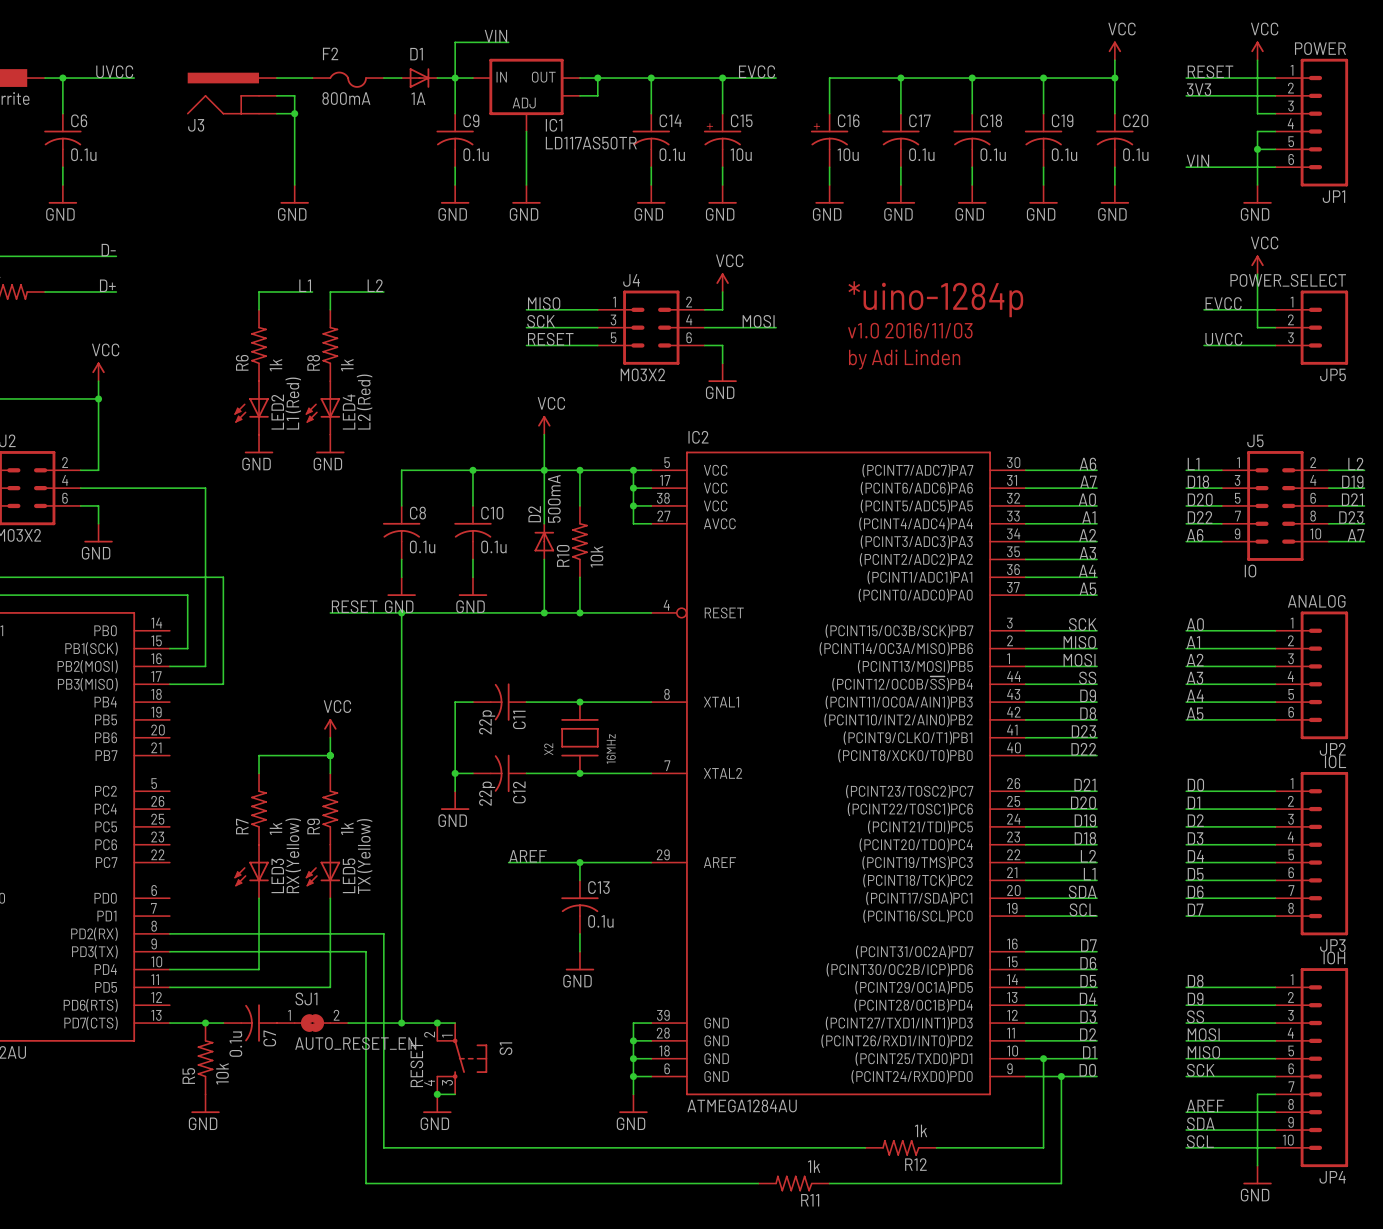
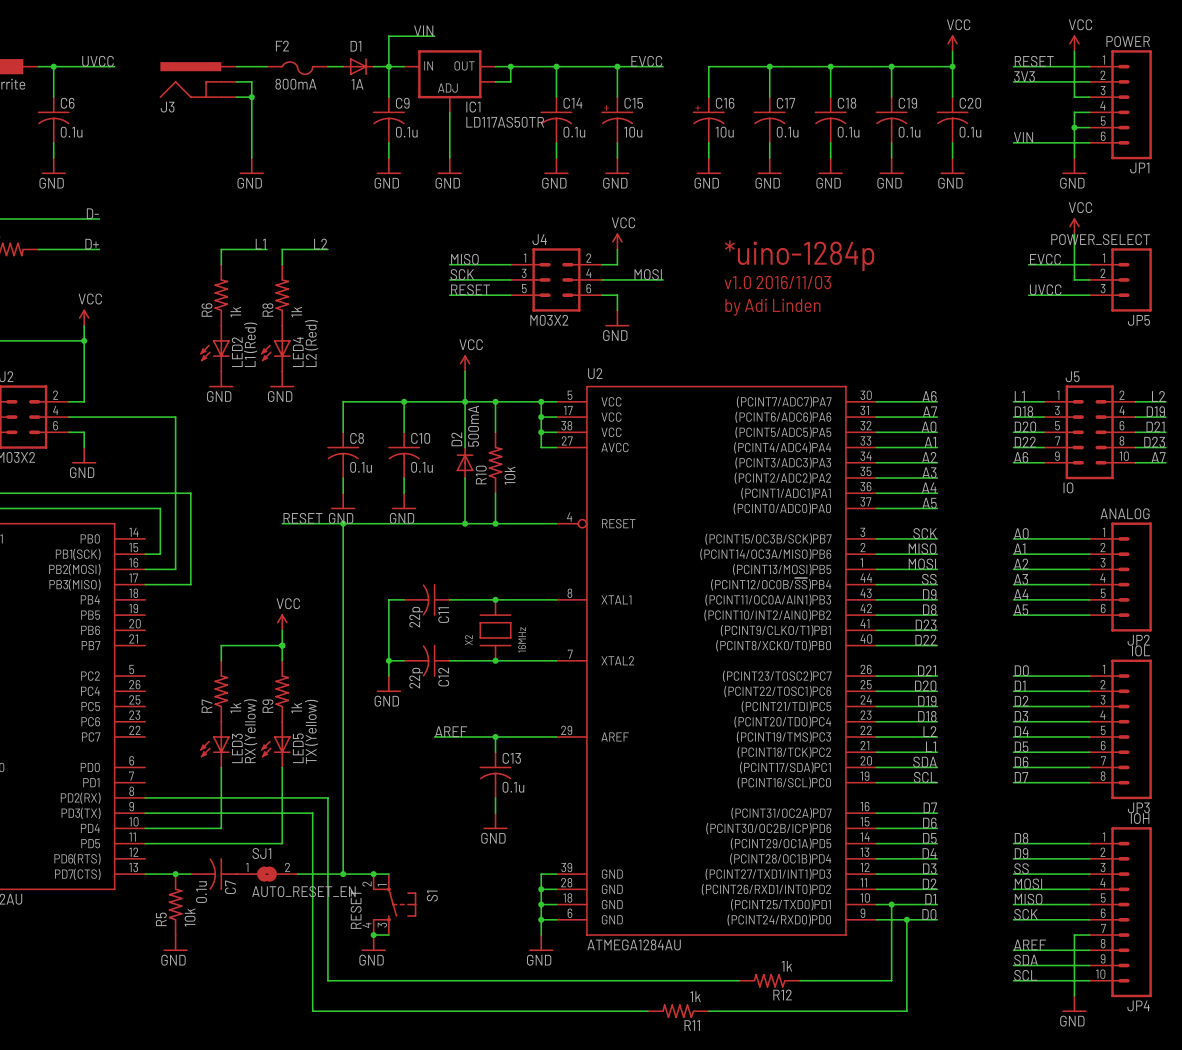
IC2 name: IC2 (698, 437) -> U2 (595, 373)

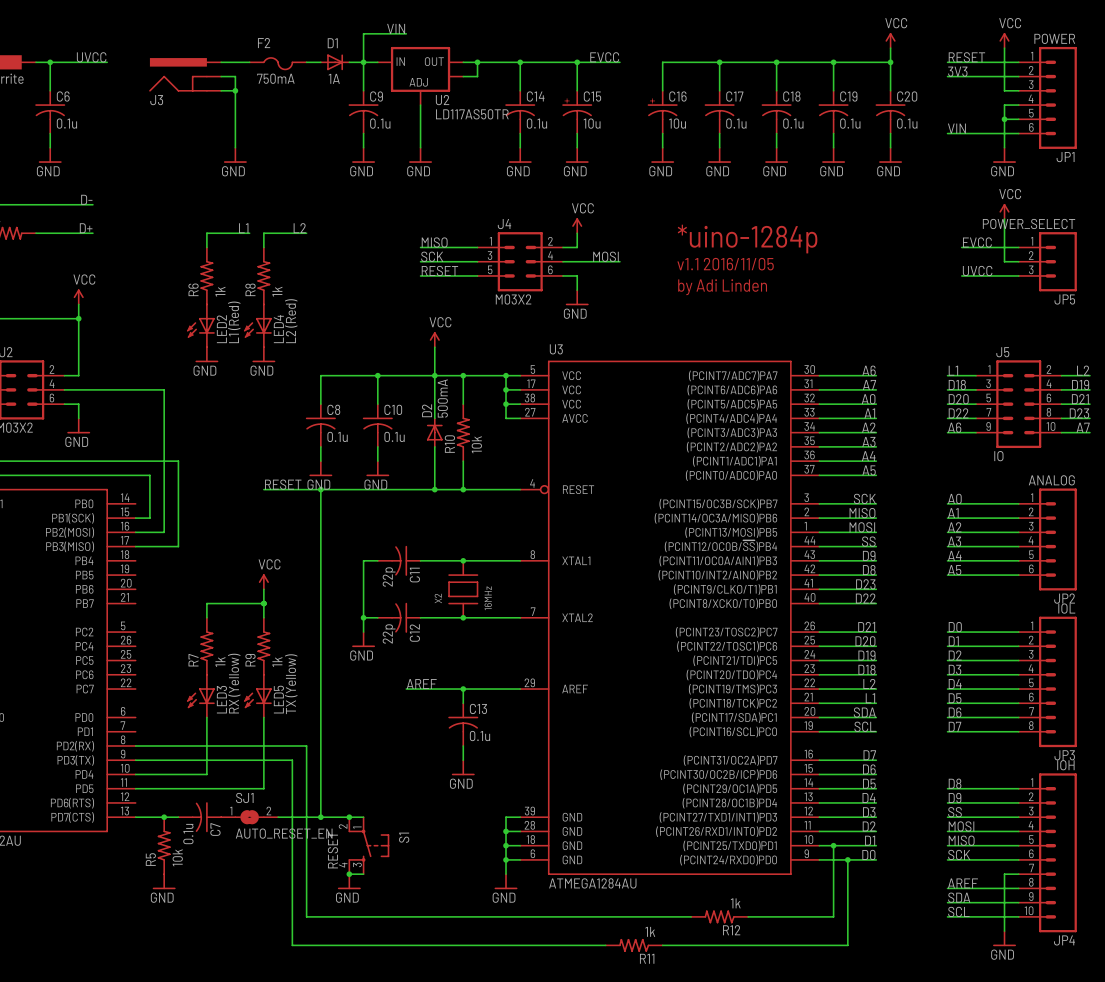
F2 value: 800mA (295, 84) -> 750mA (275, 78)
IC1 name: IC1 (473, 107) -> U2 (442, 100)
text: v1.0 2016/11/03 (777, 282) -> v1.1 2016/11/05 (725, 264)
U2 name: U2 (595, 373) -> U3 (556, 349)

